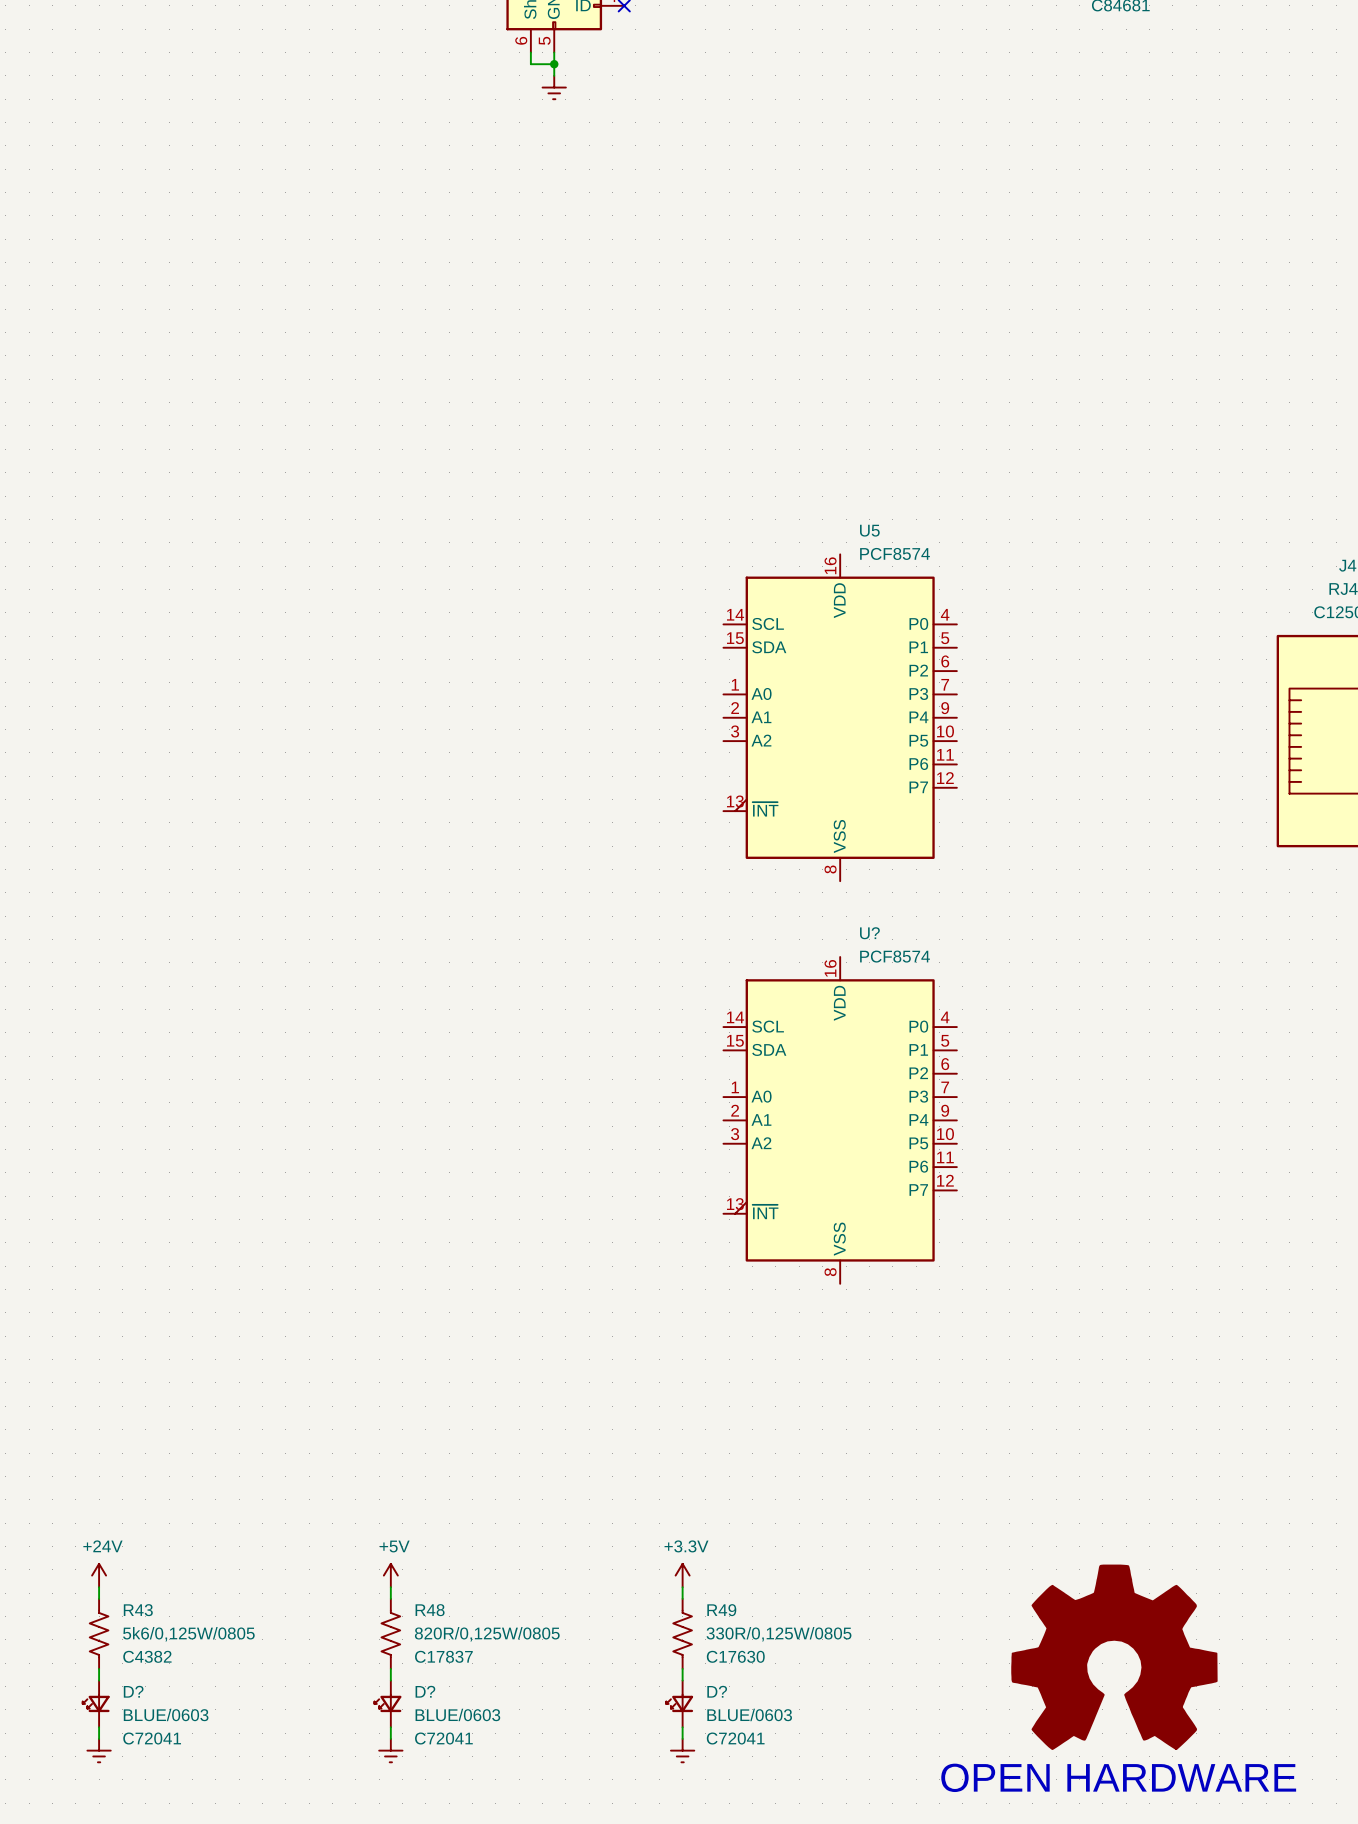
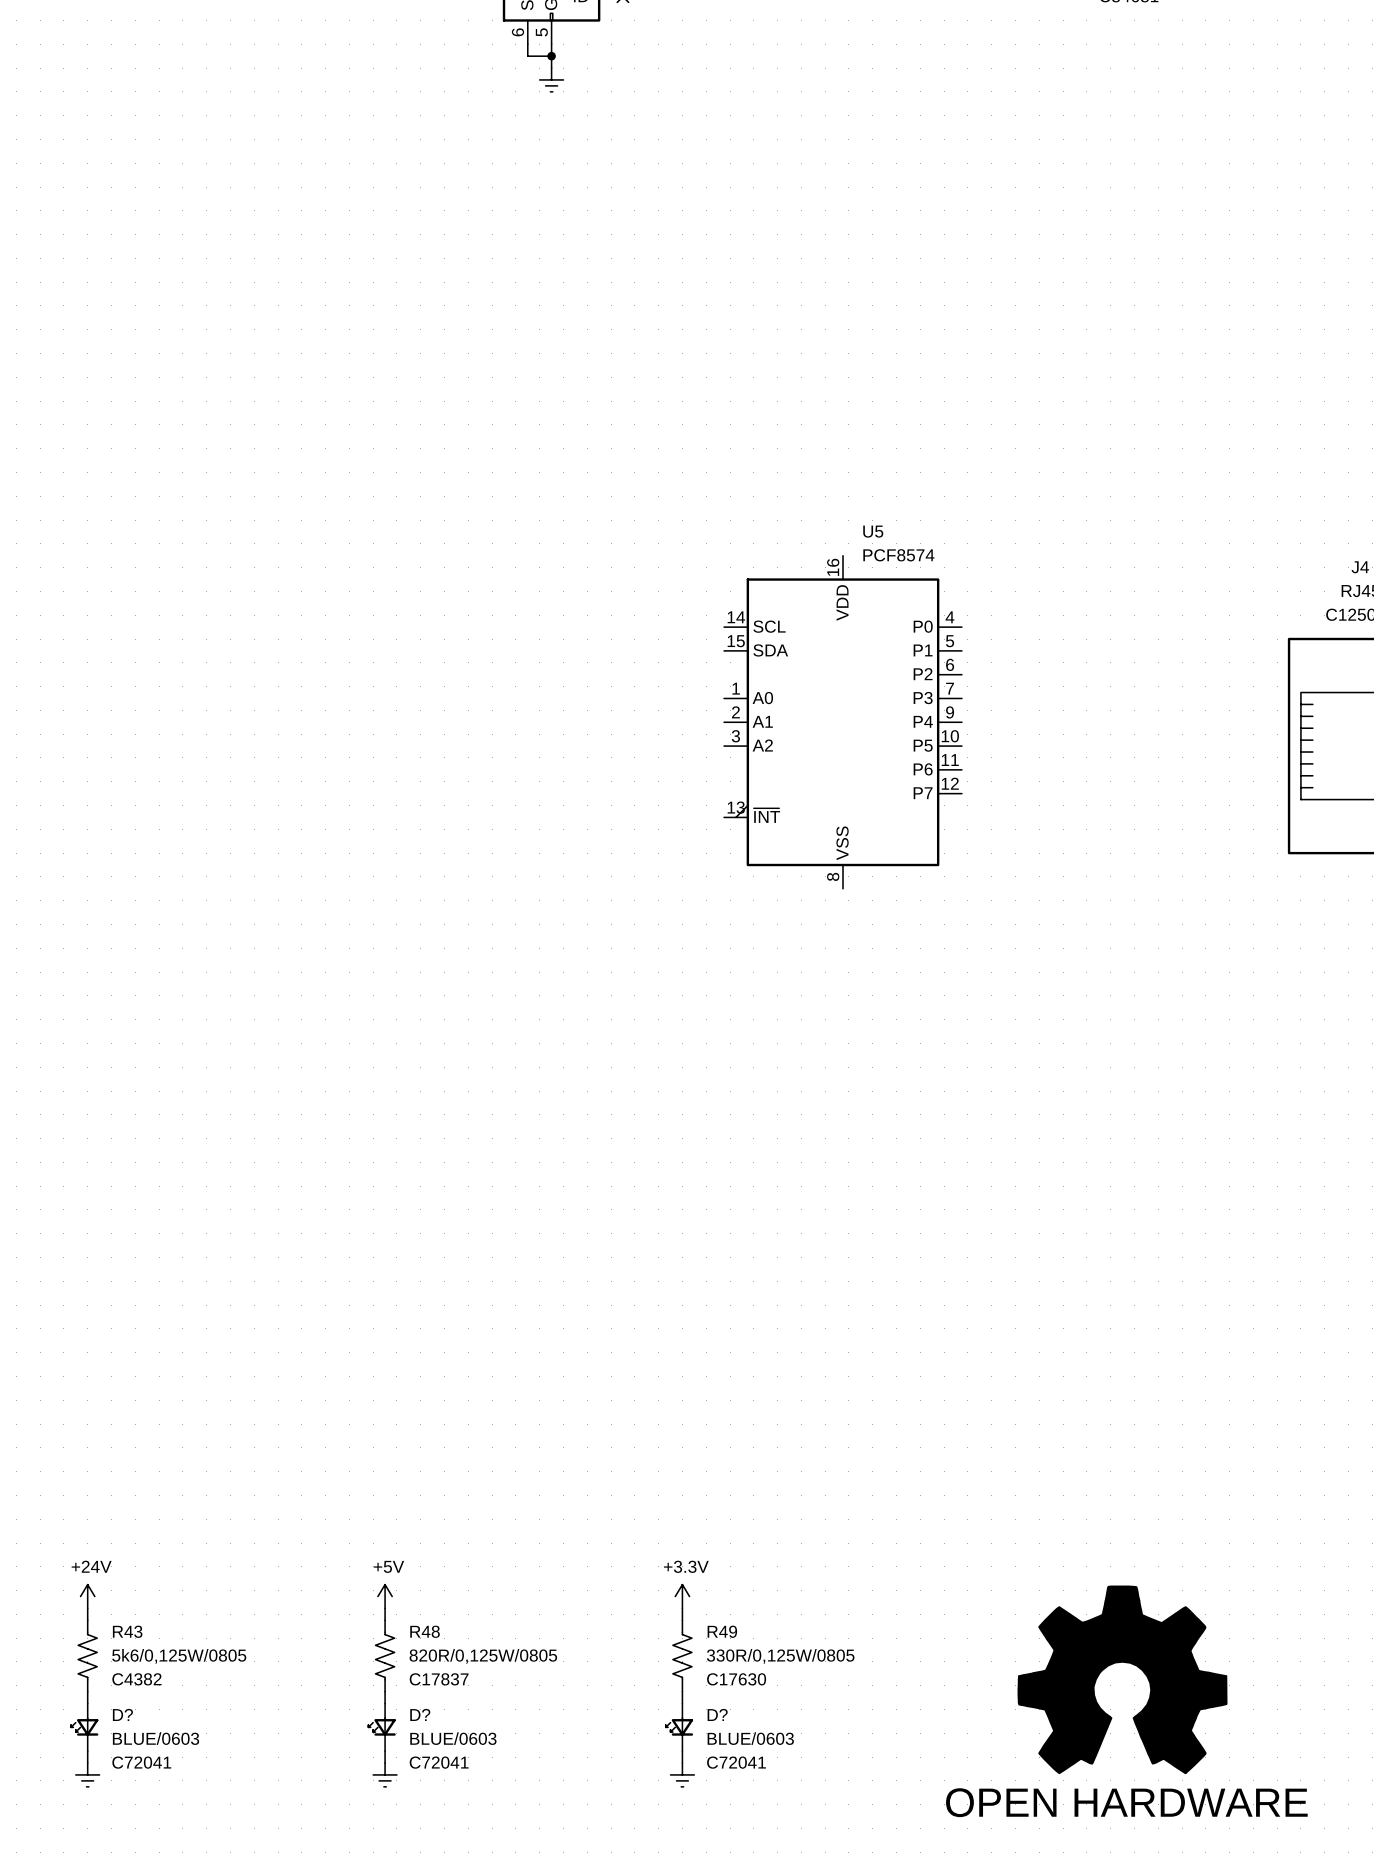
U?: PCF8574 (840, 1120) -> none

